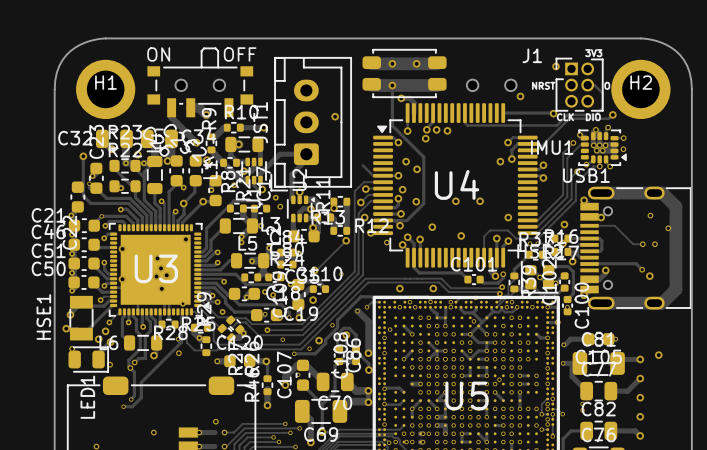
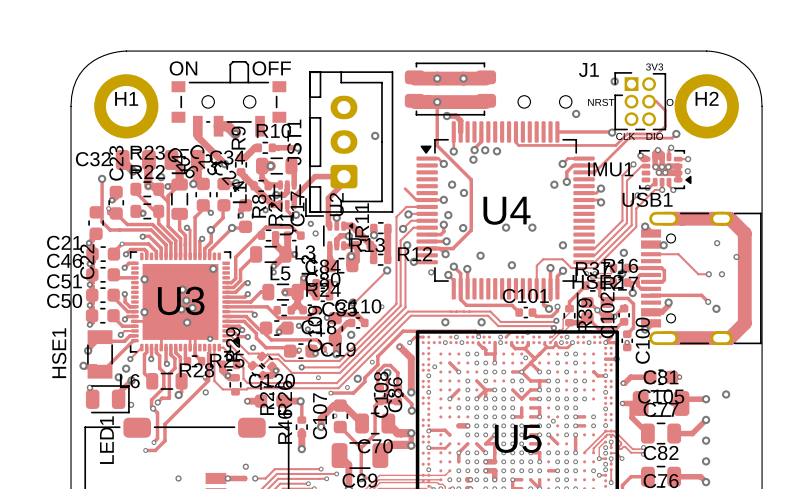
track: none -> (643, 447) (632, 449) (614, 431) (605, 431) (584, 452)
via: (528, 408) -> none
track: none -> (593, 452) (593, 448) (607, 434) (613, 434) (621, 443) (619, 448) (624, 446) (631, 452) (643, 454)
via: (536, 408) -> none

